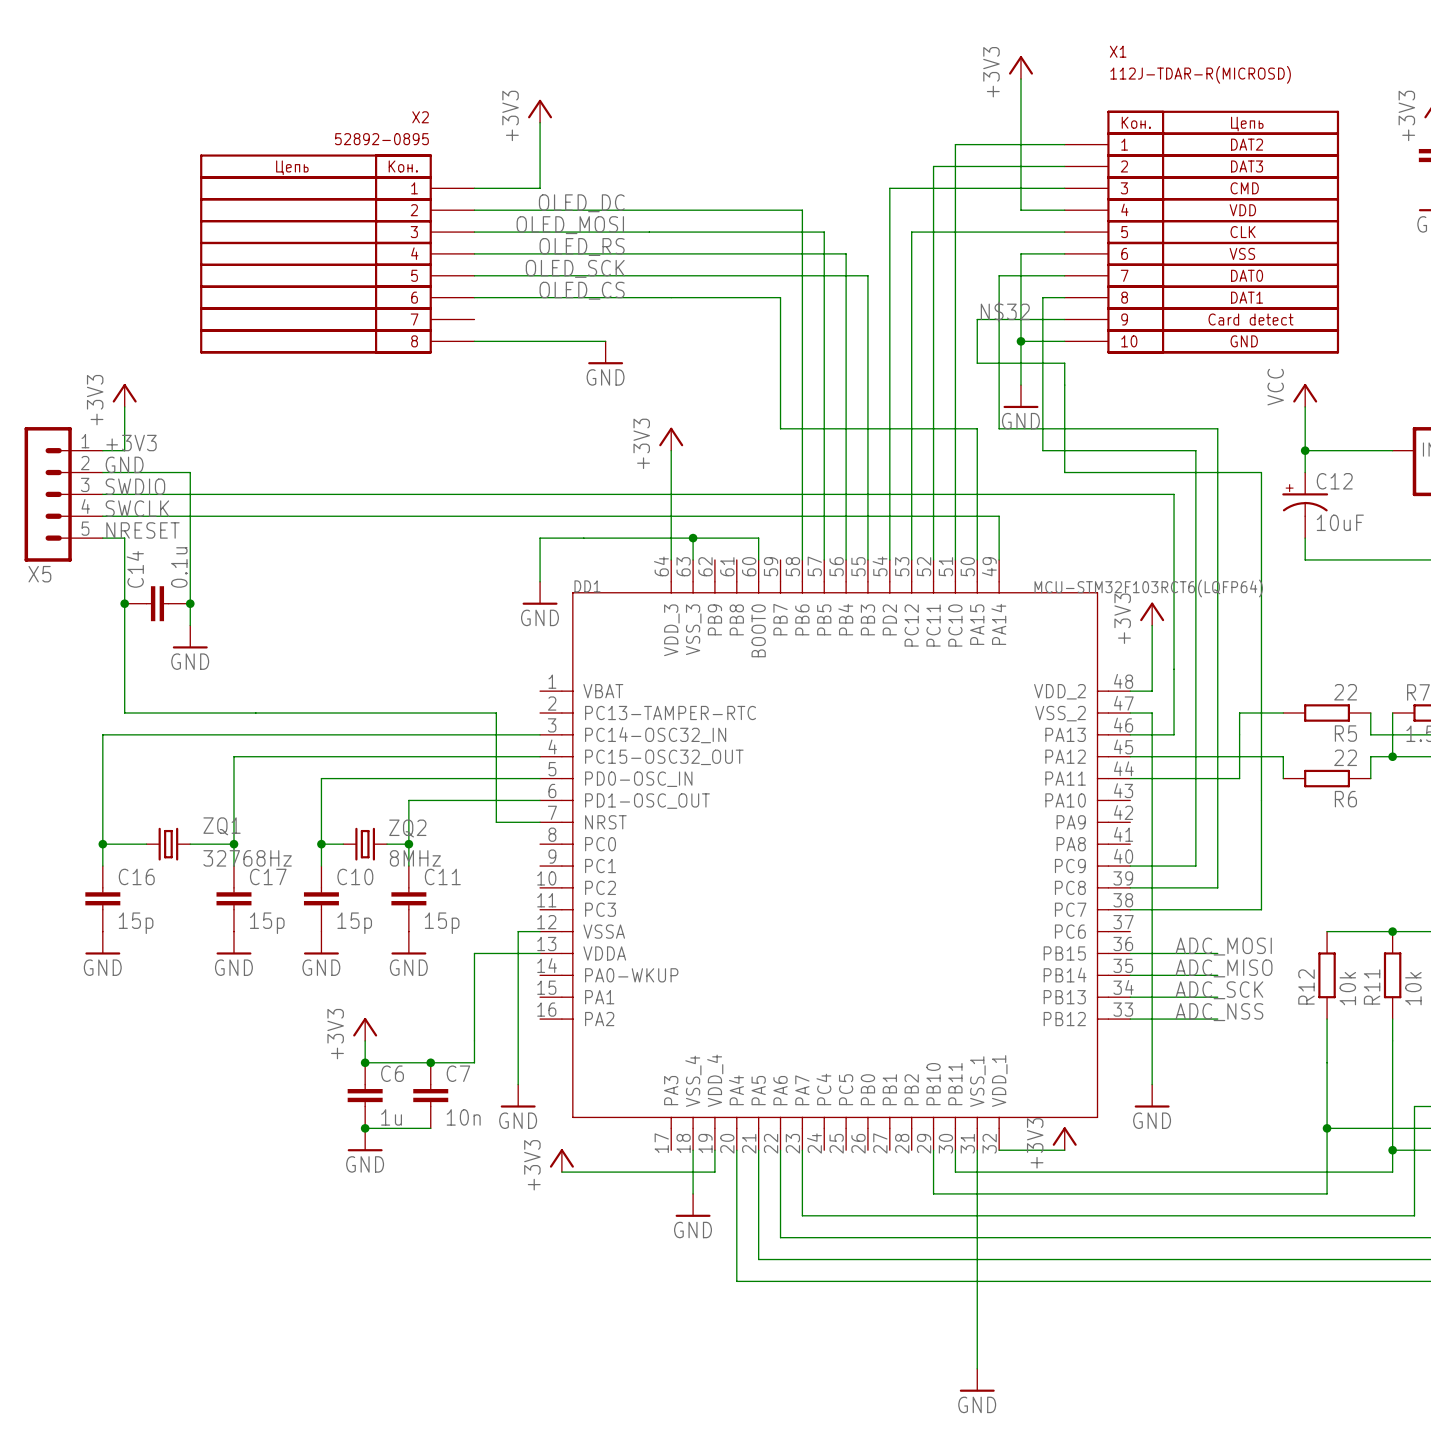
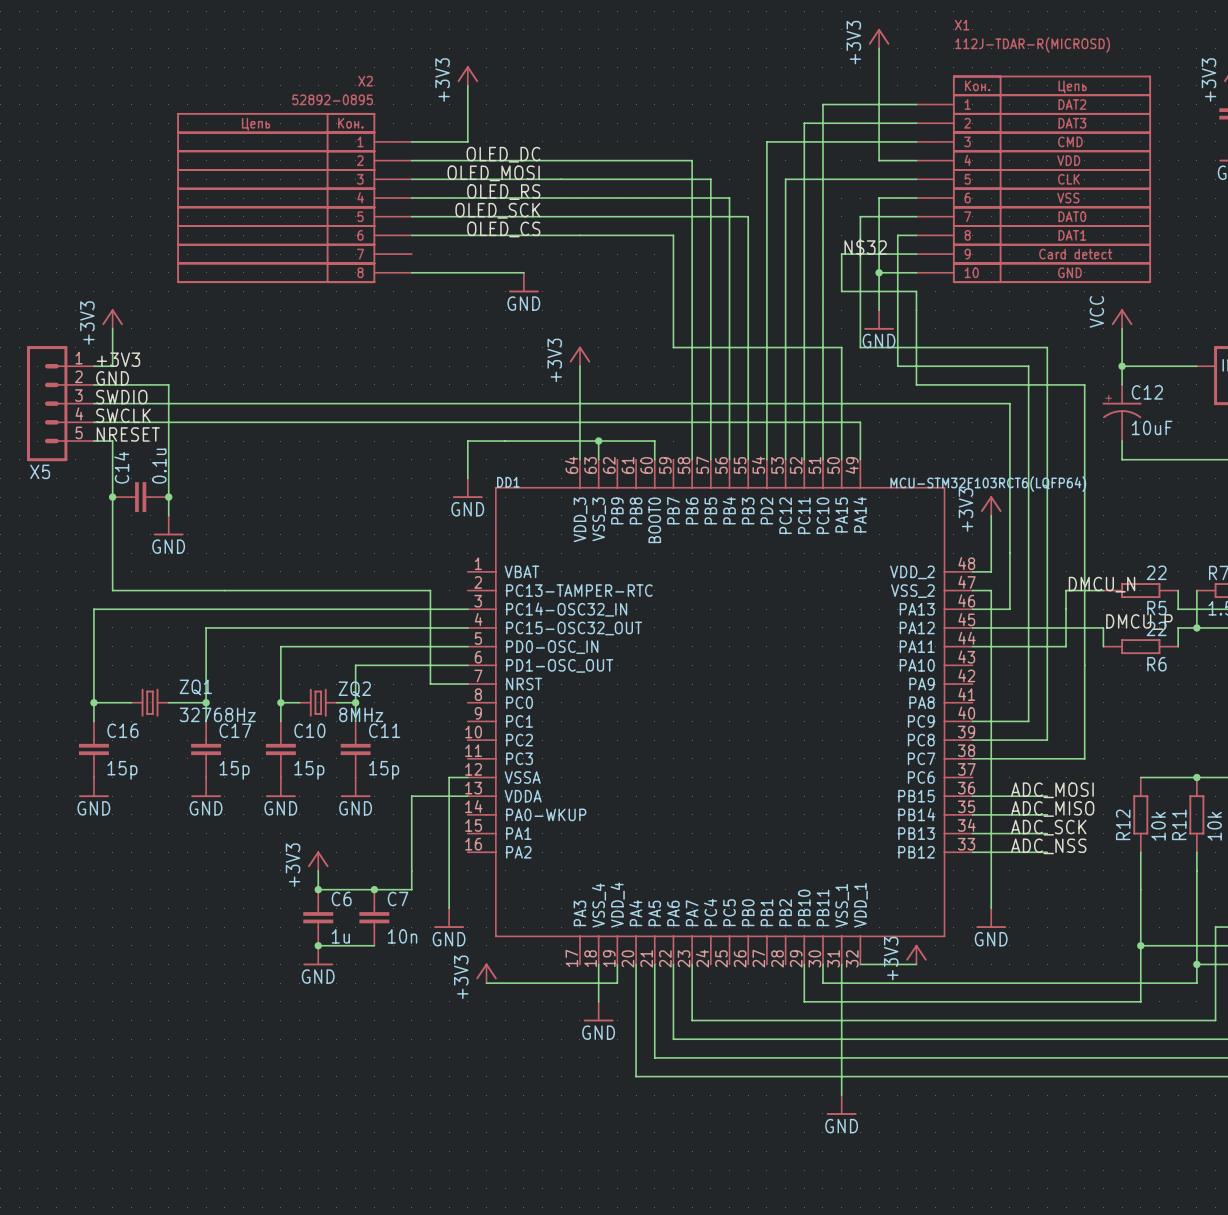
label: none -> DMCU_N (1102, 584)
label: none -> DMCU_P (1139, 622)
wire: (977, 1303) (977, 1368) -> none
power symbol position: GND (977, 1380) -> GND (841, 1105)

